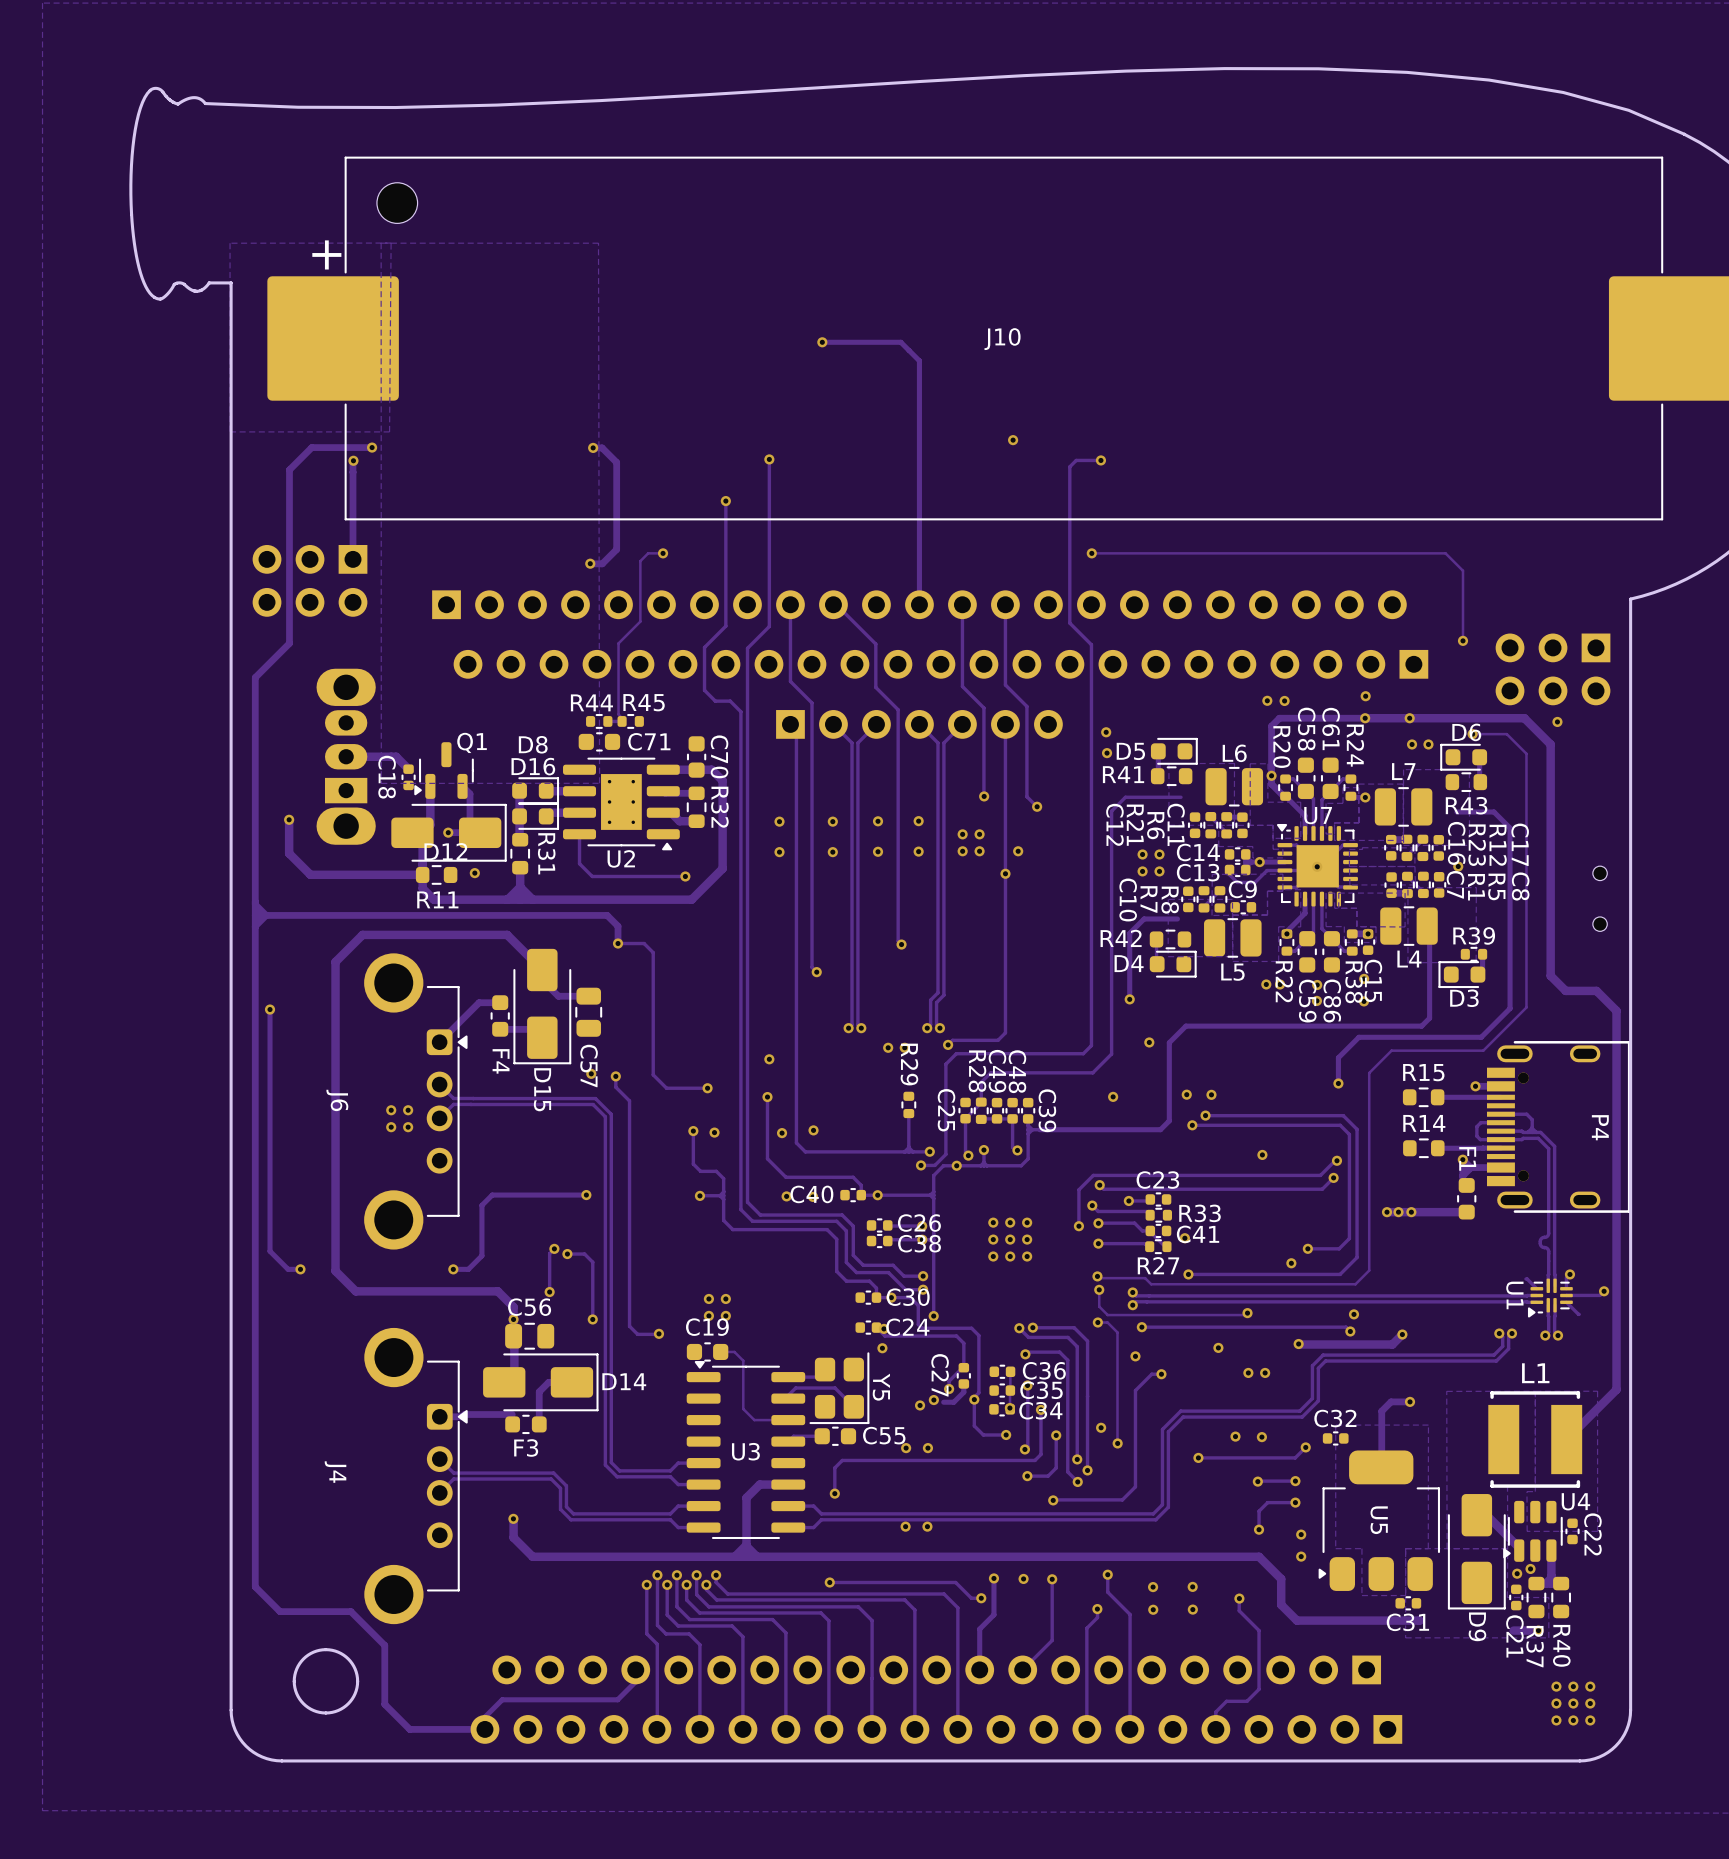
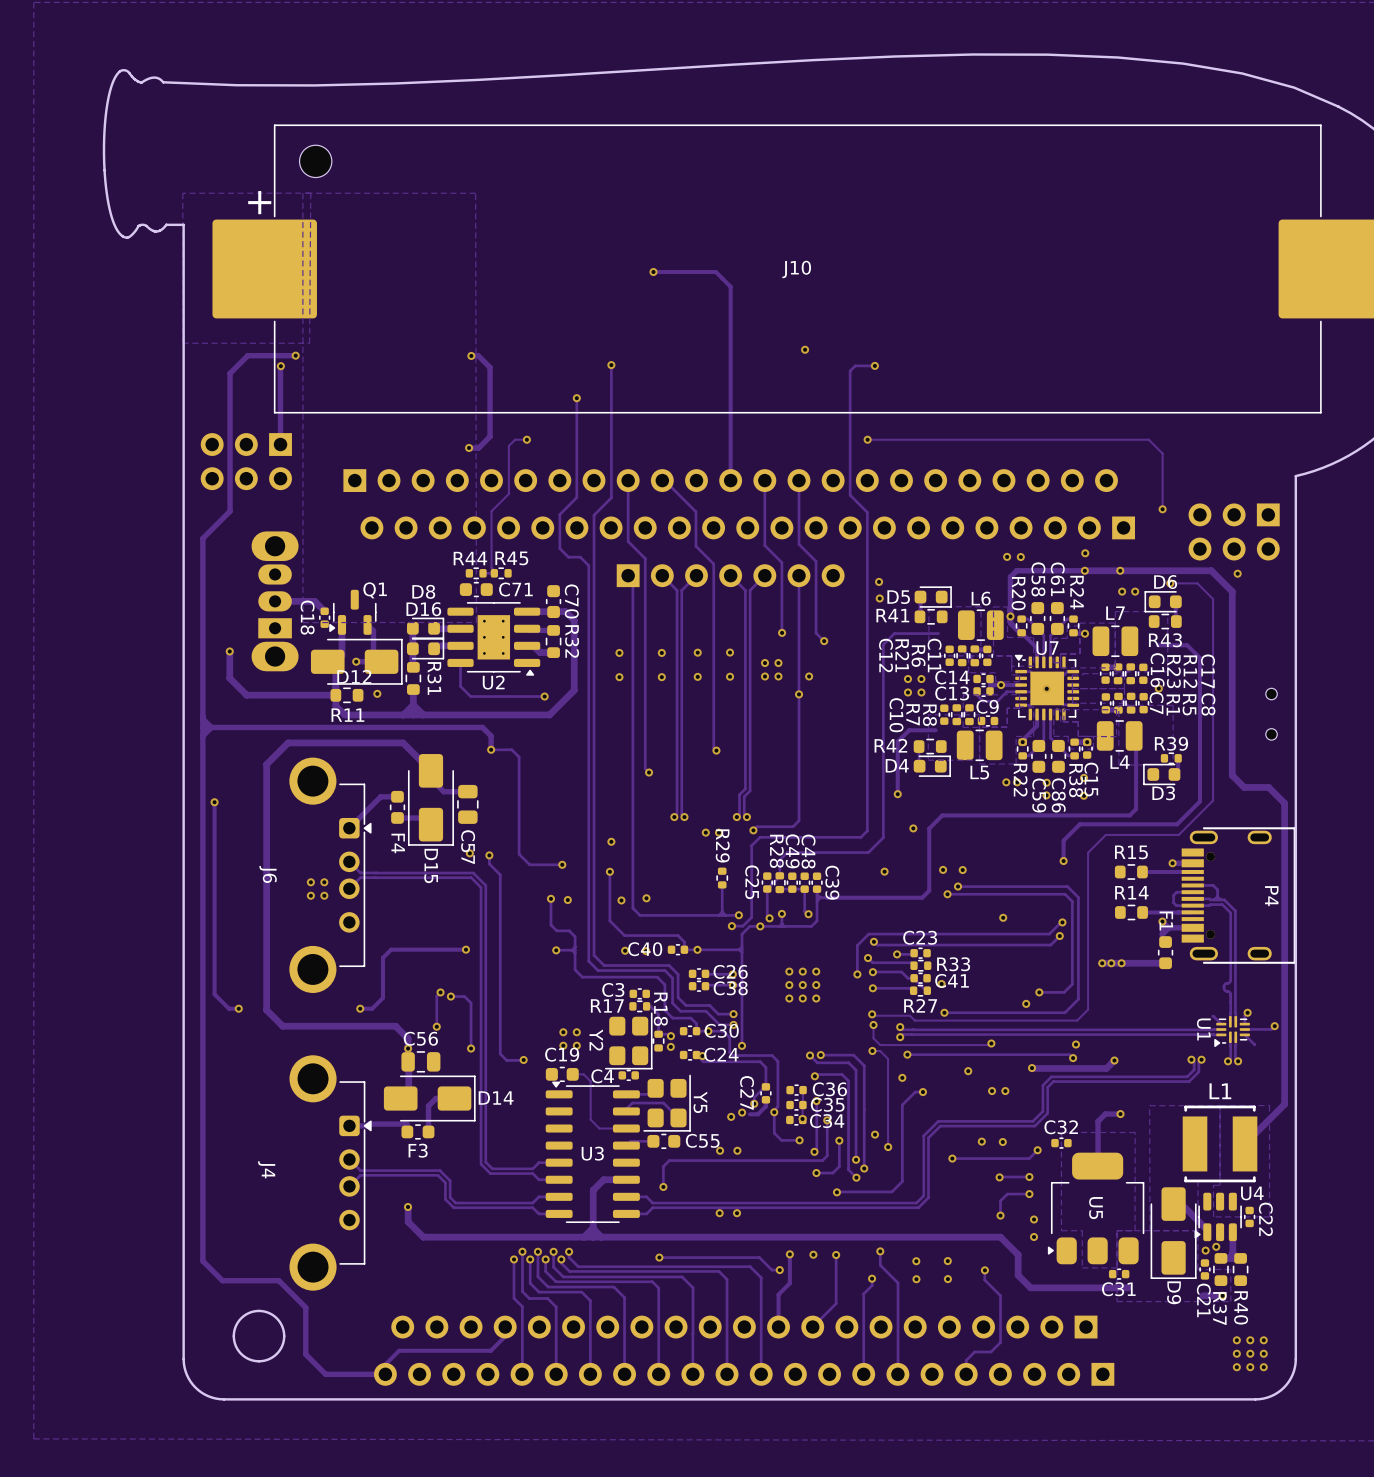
C3: none -> (639, 993)
R17: none -> (639, 1006)
track: none -> (646, 1006) (650, 1006) (658, 1014) (658, 1034) (669, 1034) (670, 1036)
via: none -> (670, 1036)
Y2: none -> (628, 1040)
R18: none -> (658, 1041)
via: none -> (670, 1046)
via: (882, 1348) -> none
C4: none -> (628, 1075)

